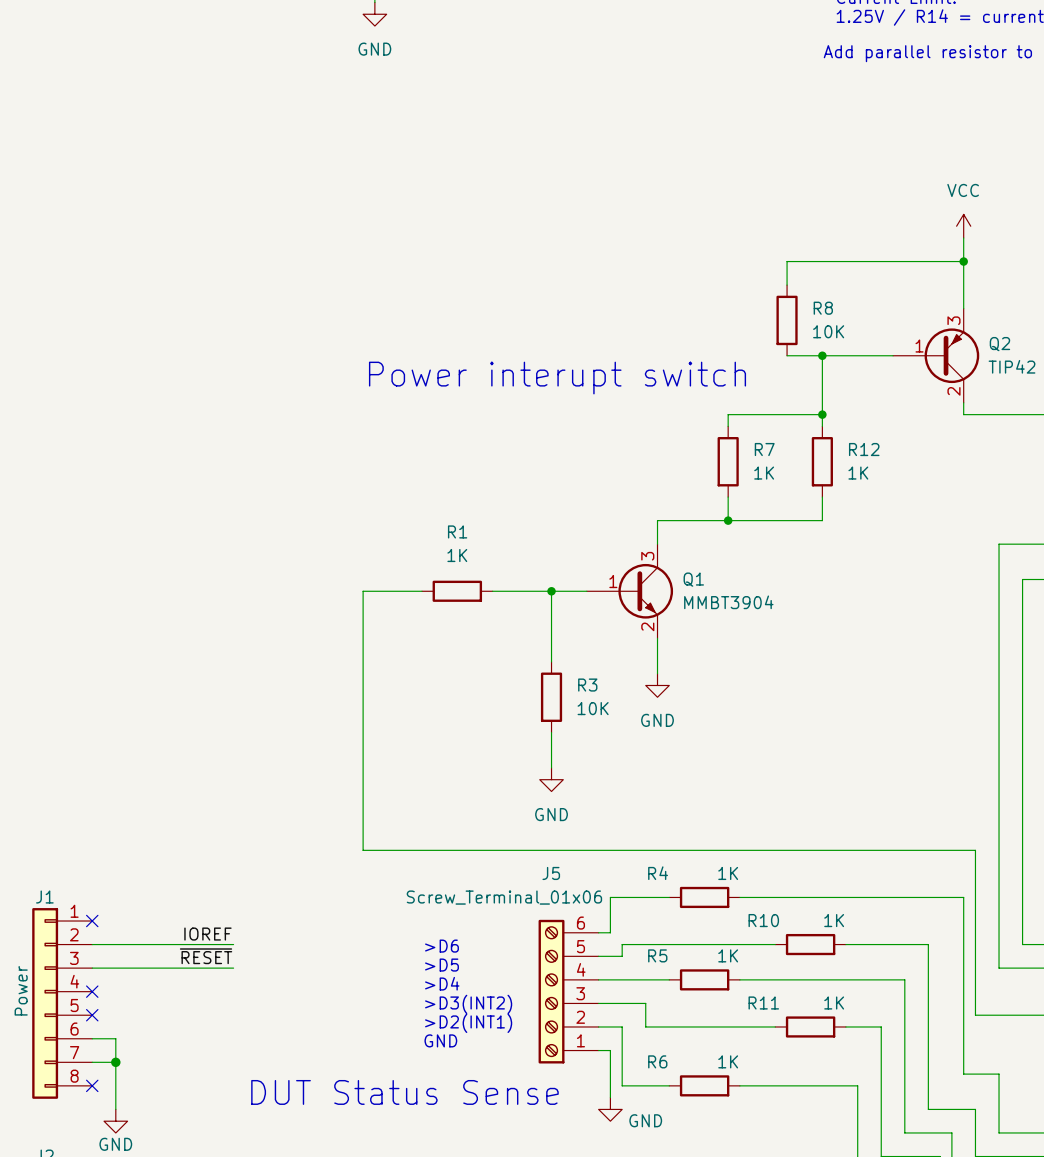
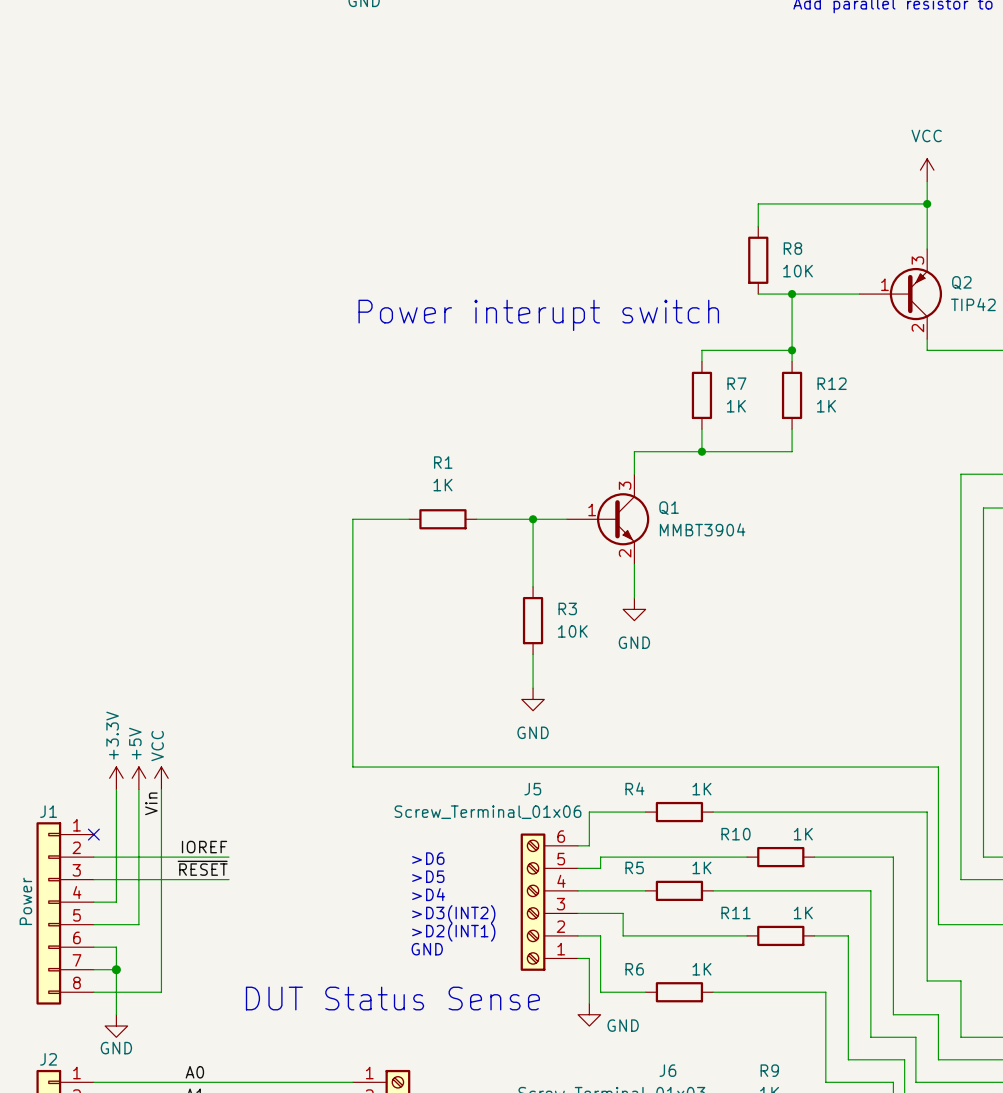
power symbol: none -> +3.3V (116, 778)
power symbol: none -> +5V (138, 778)
power symbol: none -> VCC (161, 778)
wire: none -> (116, 789) (116, 902) (93, 902)
wire: none -> (138, 789) (138, 924) (93, 924)
wire: none -> (161, 789) (161, 992) (93, 992)
label: none -> Vin (151, 803)
no-connect mark: (92, 991) -> none
no-connect mark: (92, 1015) -> none
no-connect mark: (92, 1085) -> none

